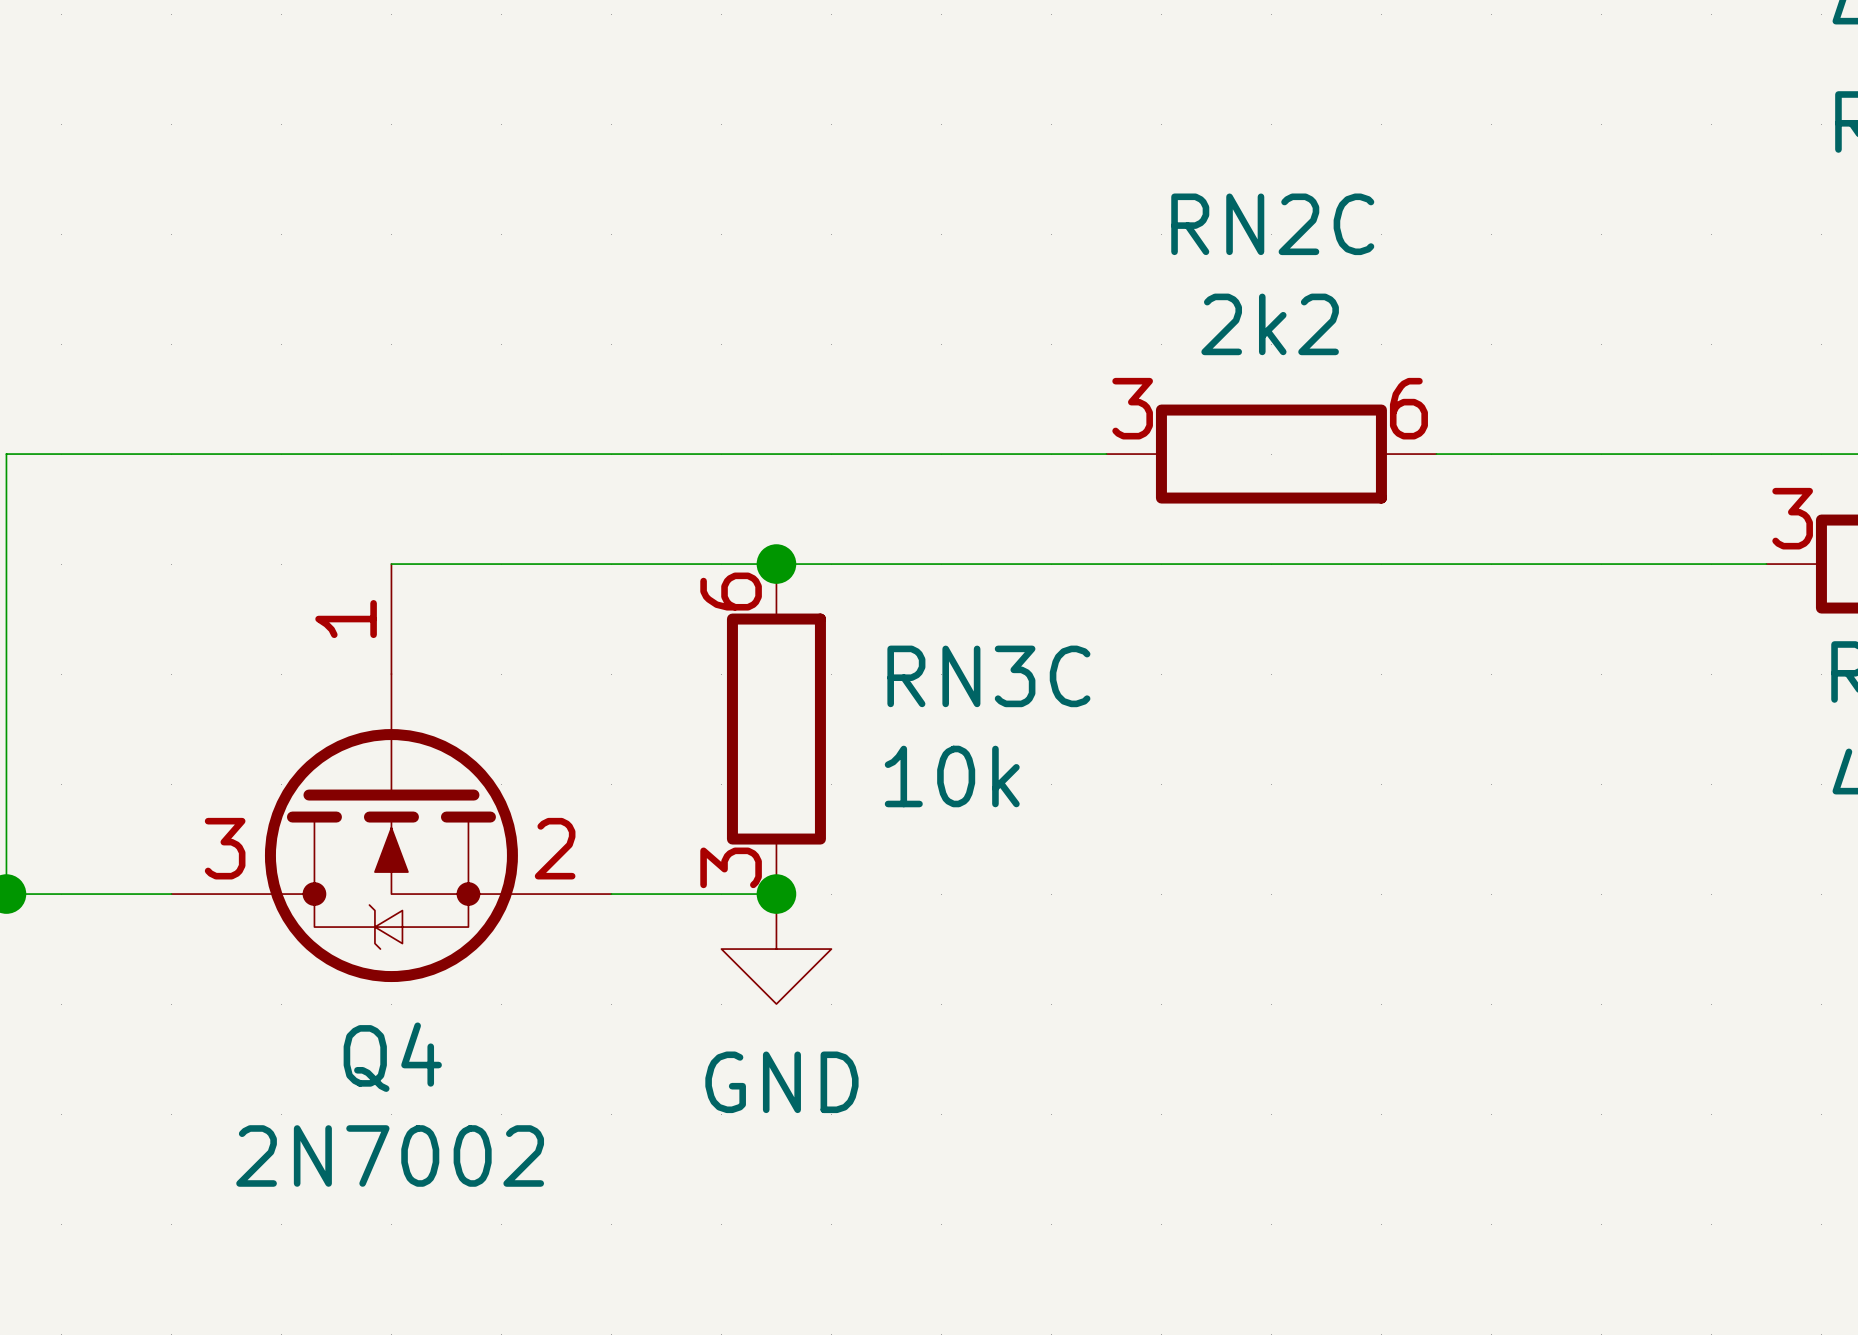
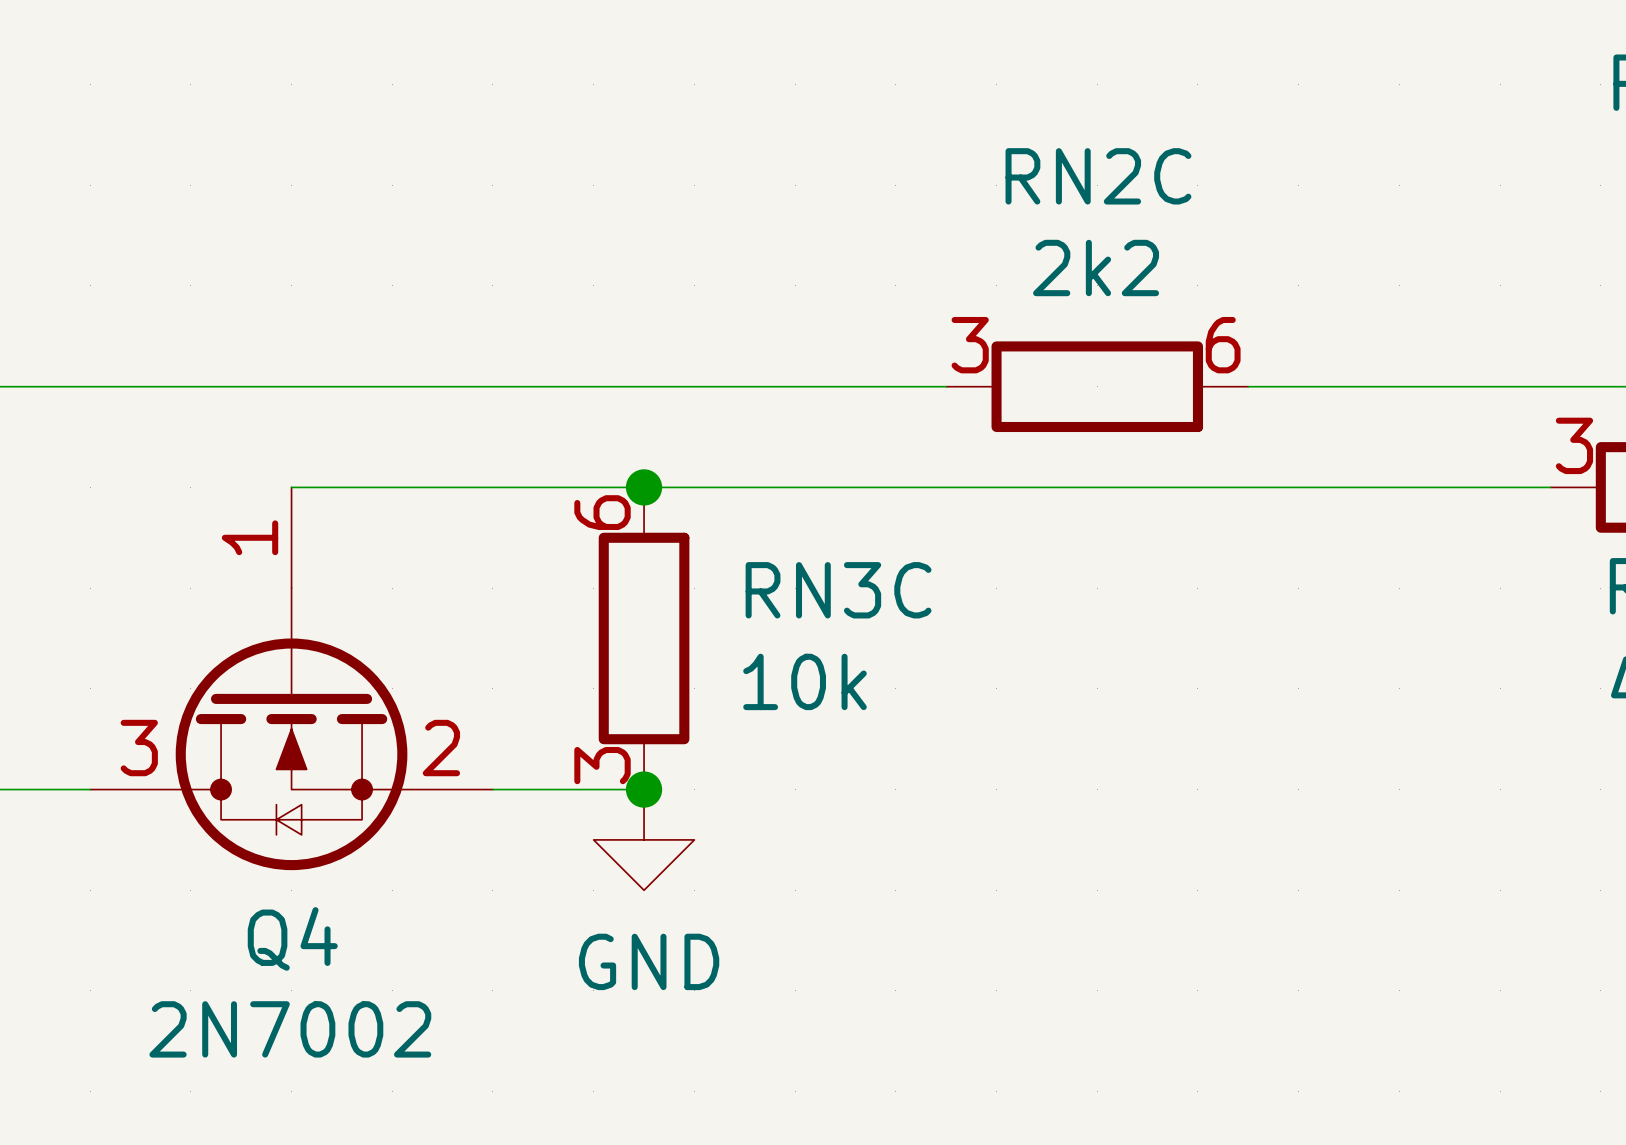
Q4 symbol: [171, 564, 612, 983] -> [90, 487, 493, 871]

